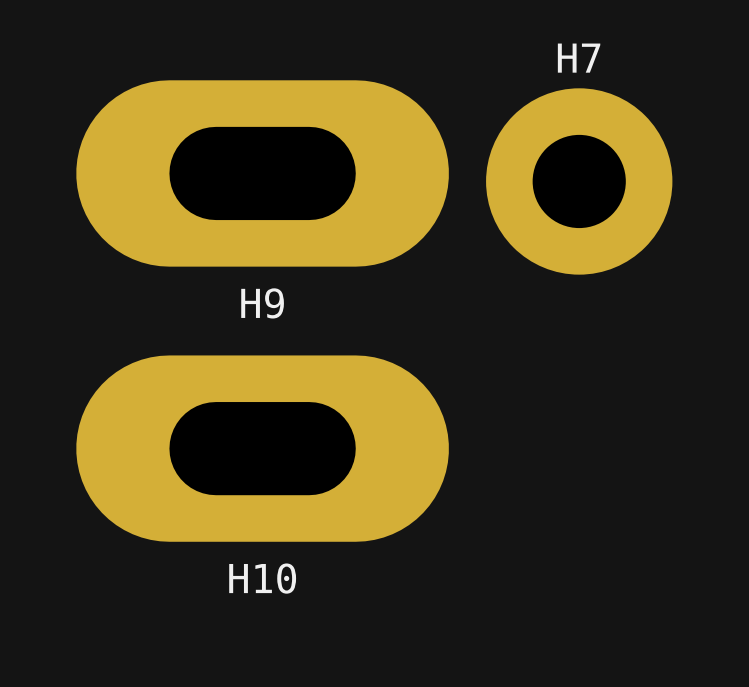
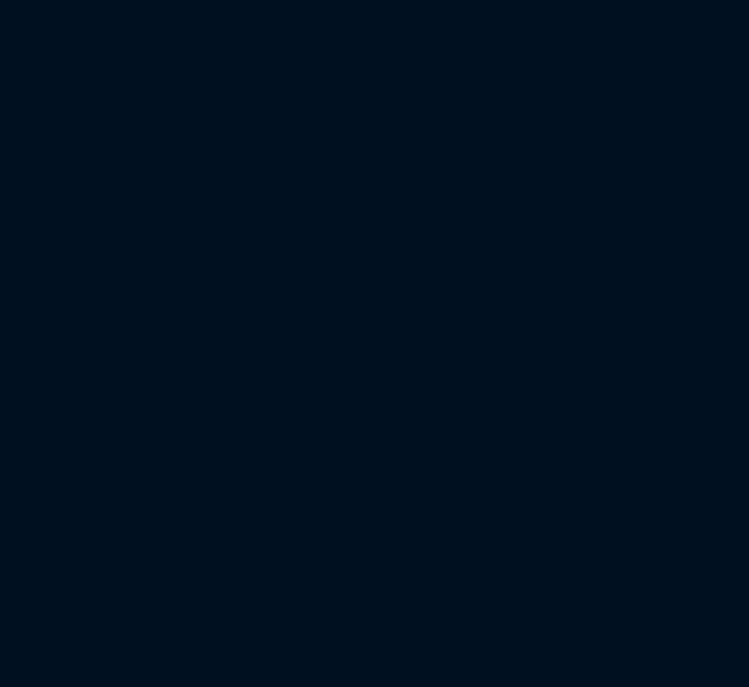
H9: (262, 173) -> none
H7: (579, 181) -> none
H10: (262, 448) -> none

